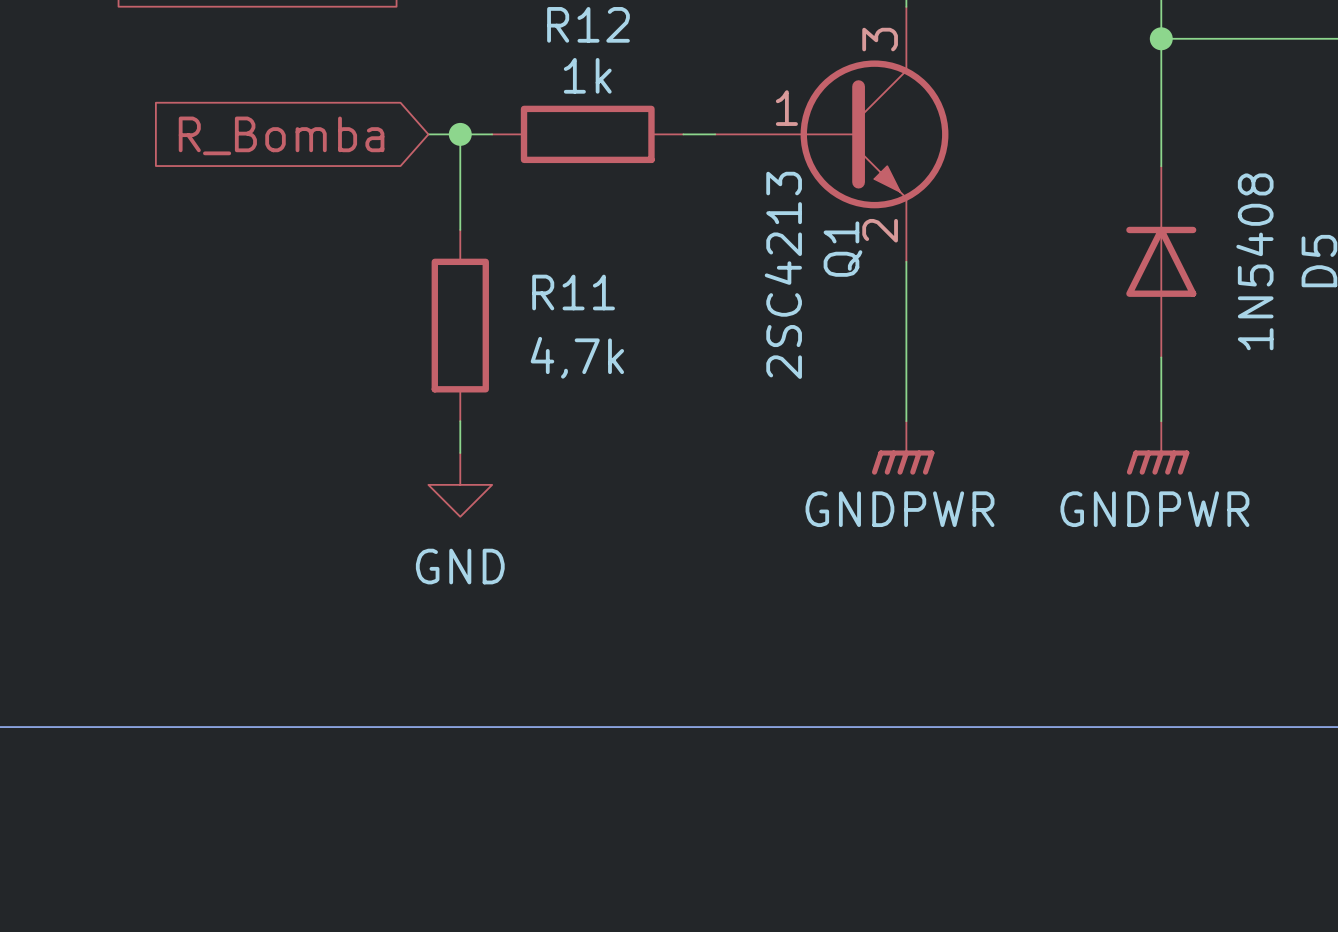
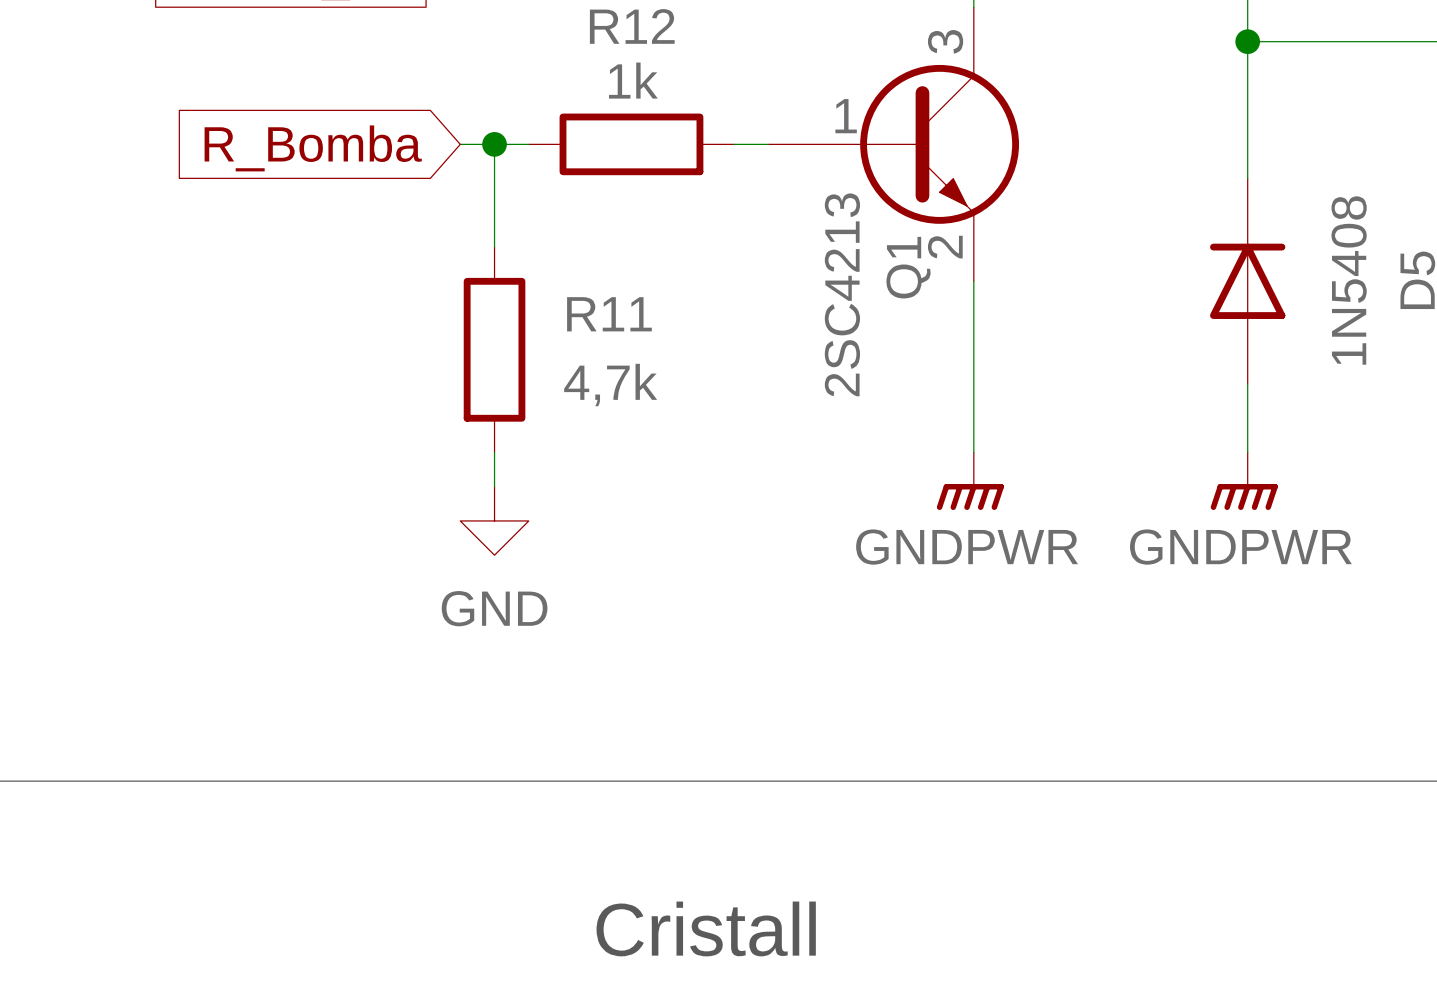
text: none -> Cristall (706, 928)

